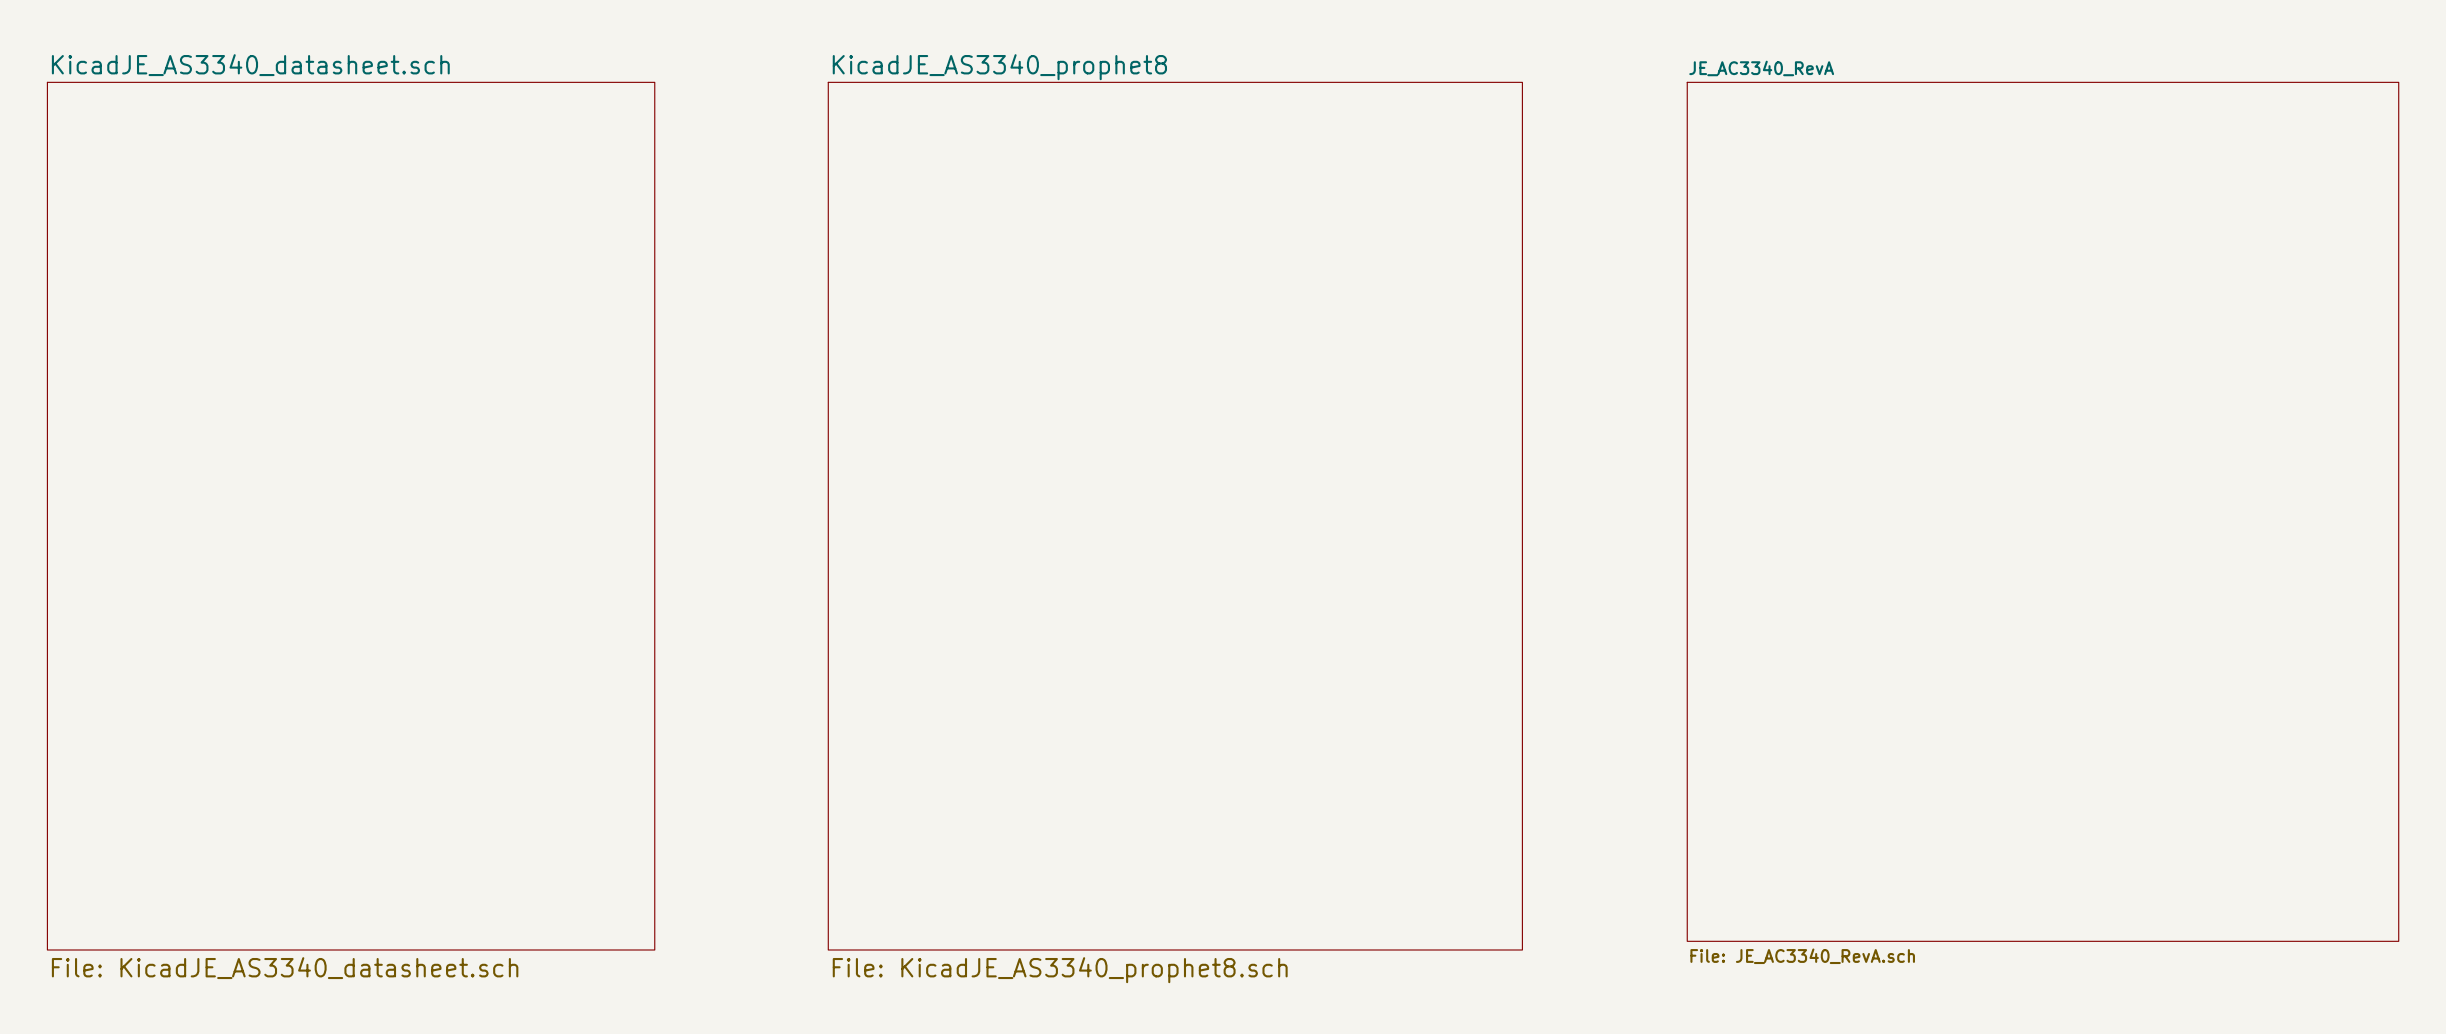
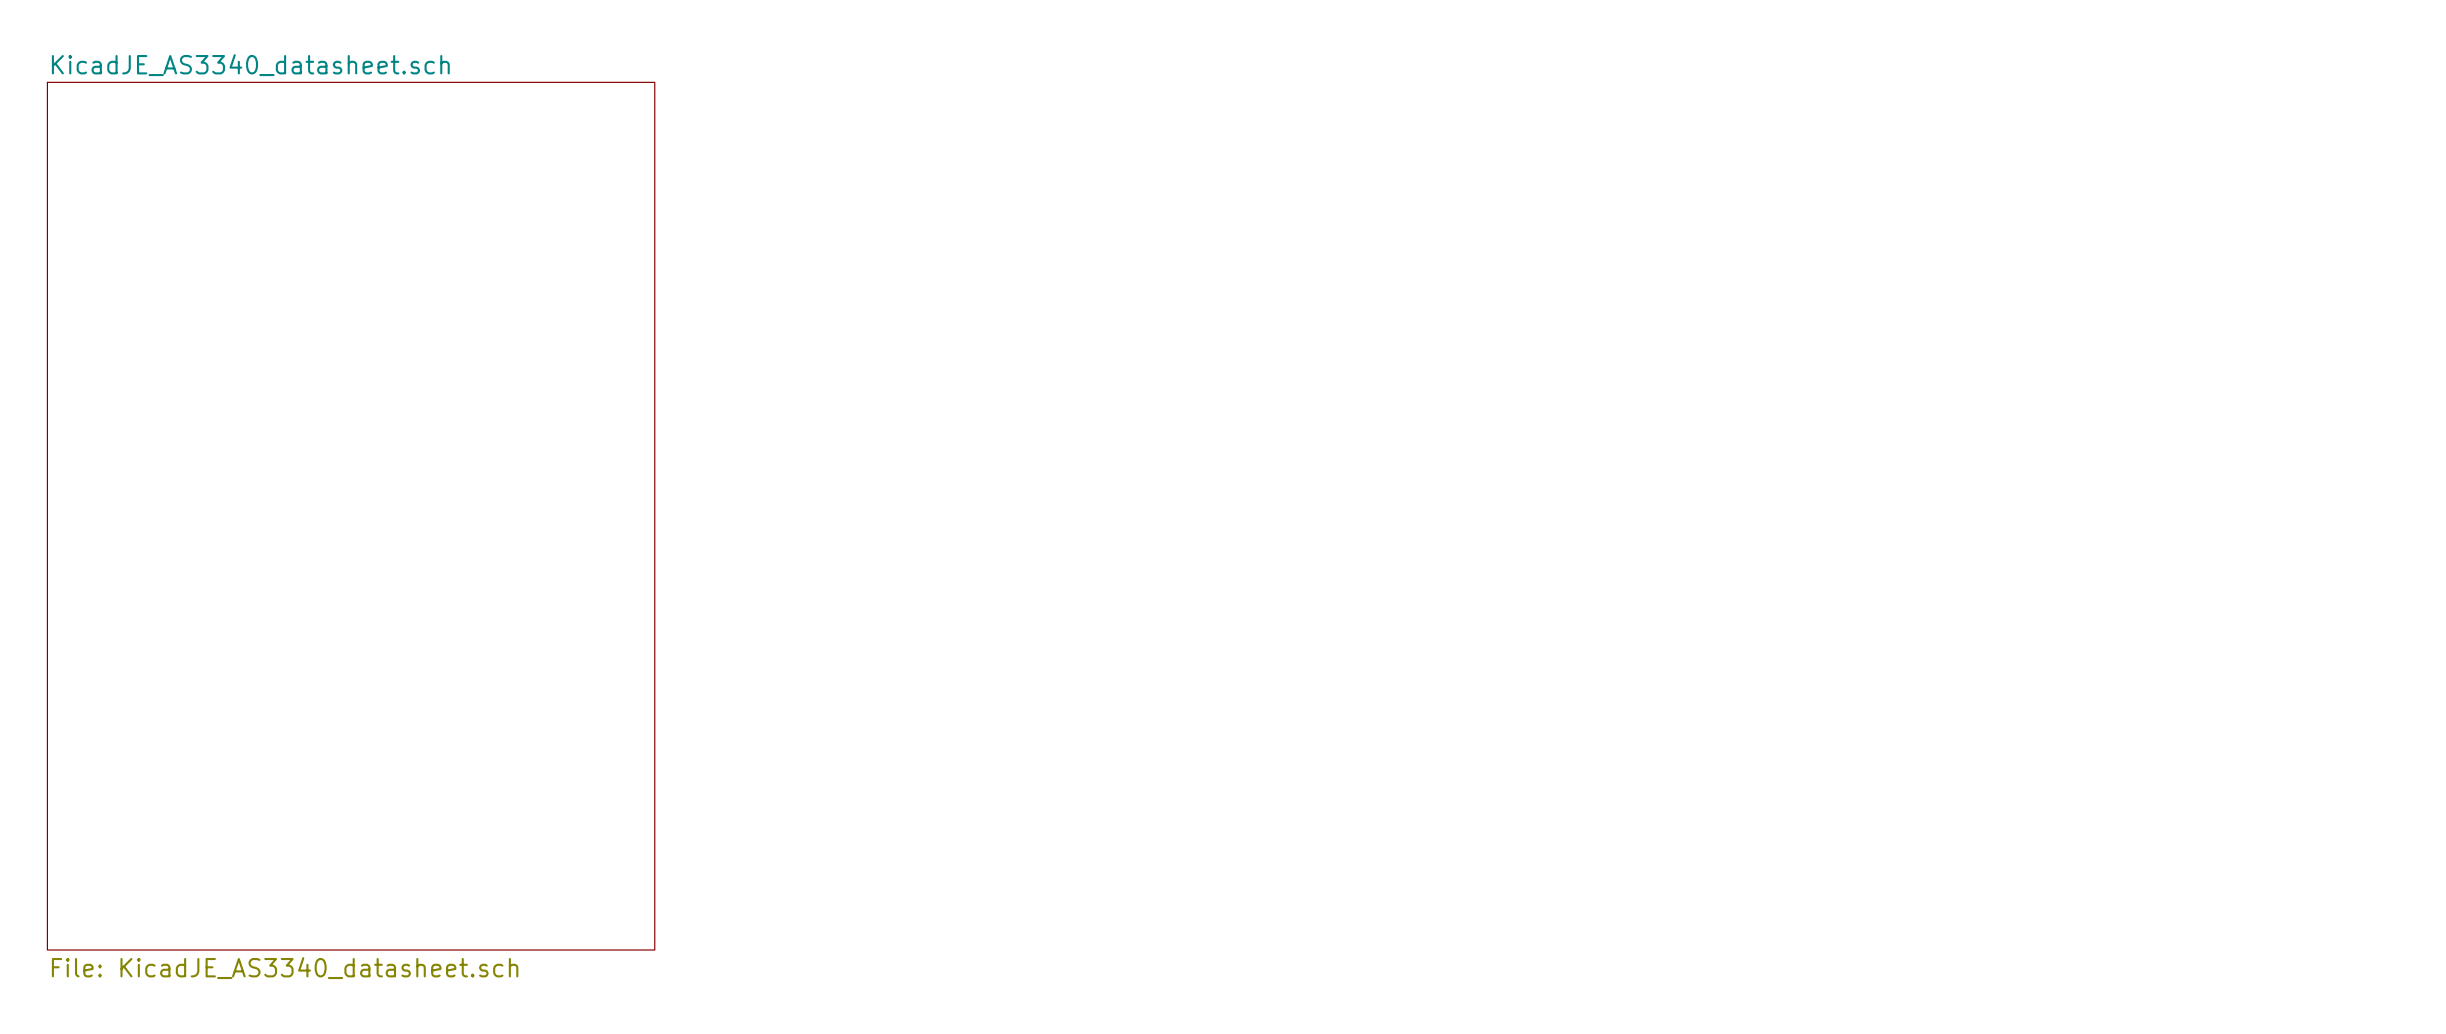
sheet JE_AC3340_RevA: File: JE_AC3340_RevA.sch (2042, 511) -> none
sheet KicadJE_AS3340_prophet8: File: KicadJE_AS3340_prophet8.sch (1175, 516) -> none

